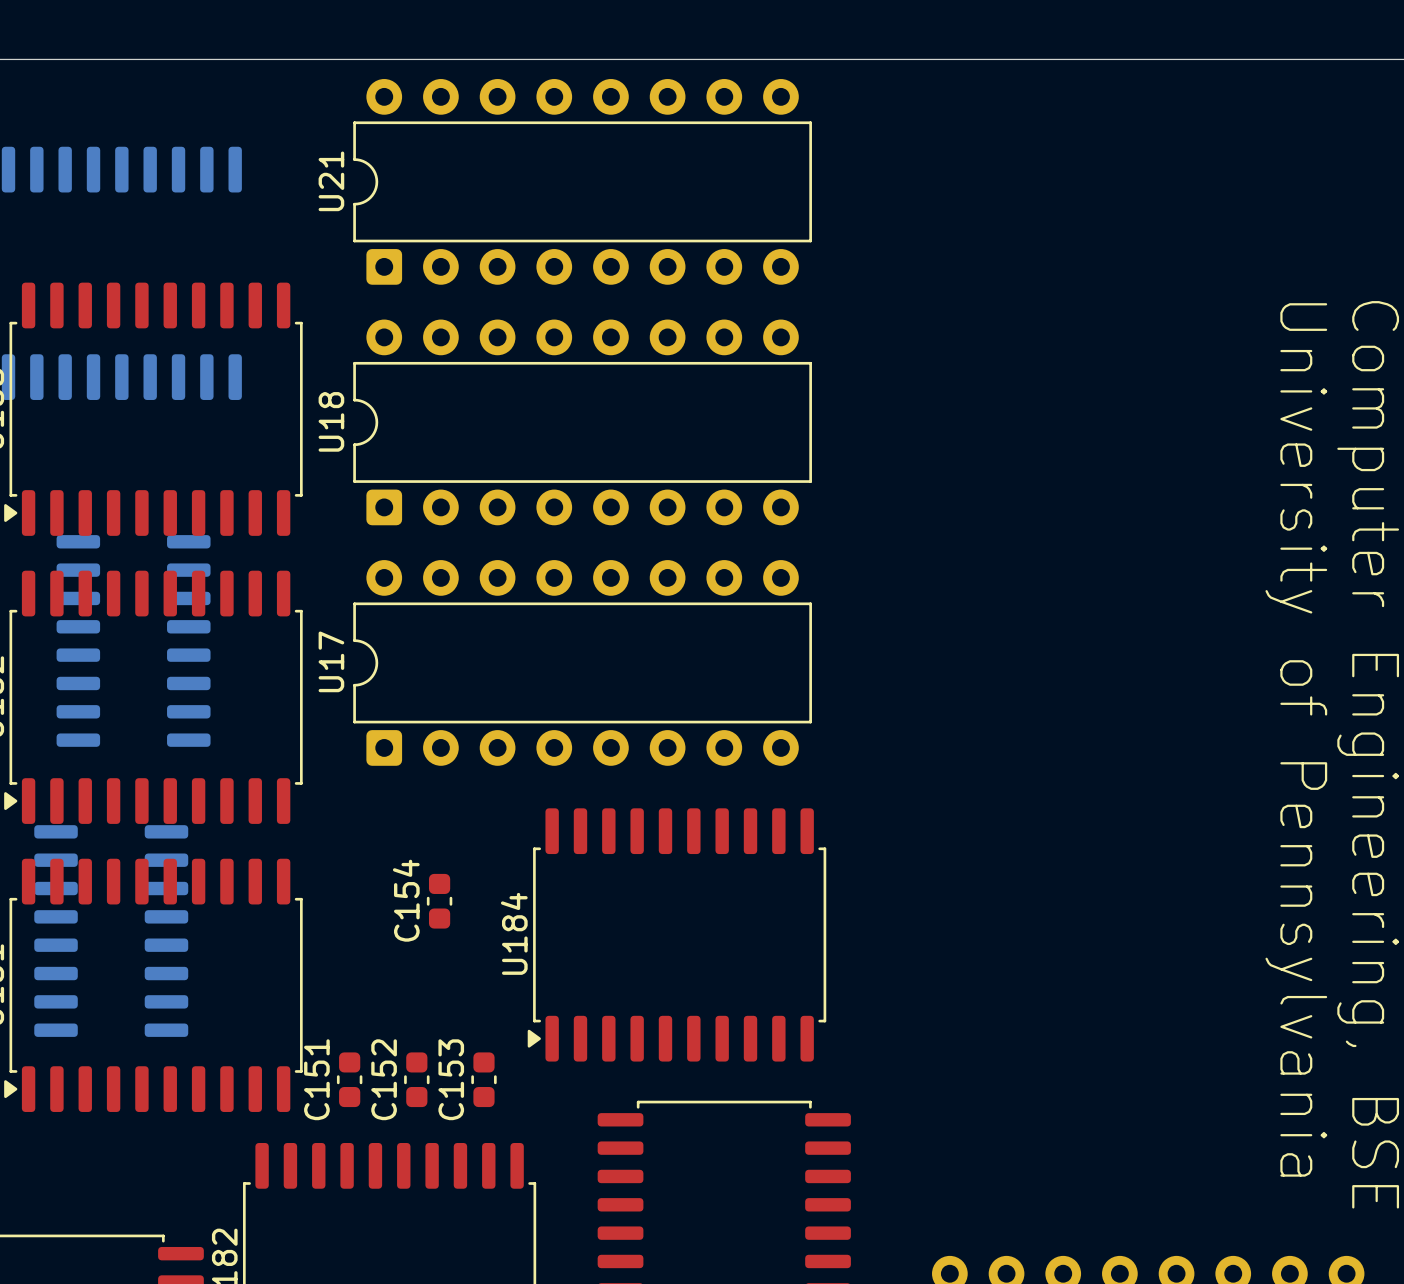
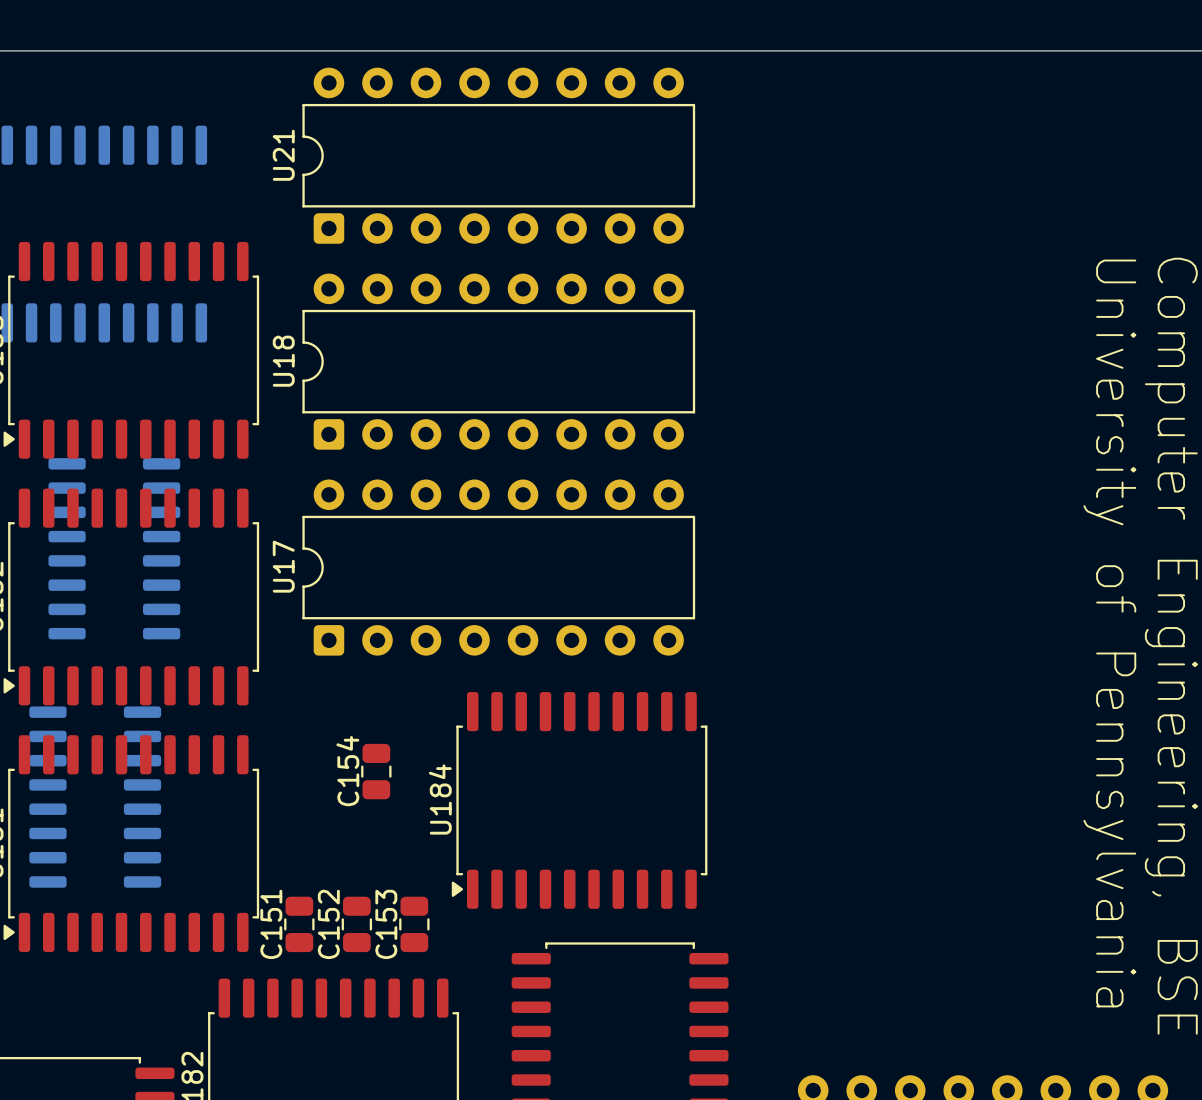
C154 footprint: [426, 873, 453, 929] -> [361, 743, 392, 800]
C151 footprint: [336, 1052, 363, 1108] -> [284, 896, 315, 953]
C152 footprint: [404, 1052, 430, 1108] -> [341, 896, 373, 953]
C153 footprint: [471, 1052, 497, 1108] -> [399, 896, 430, 953]

